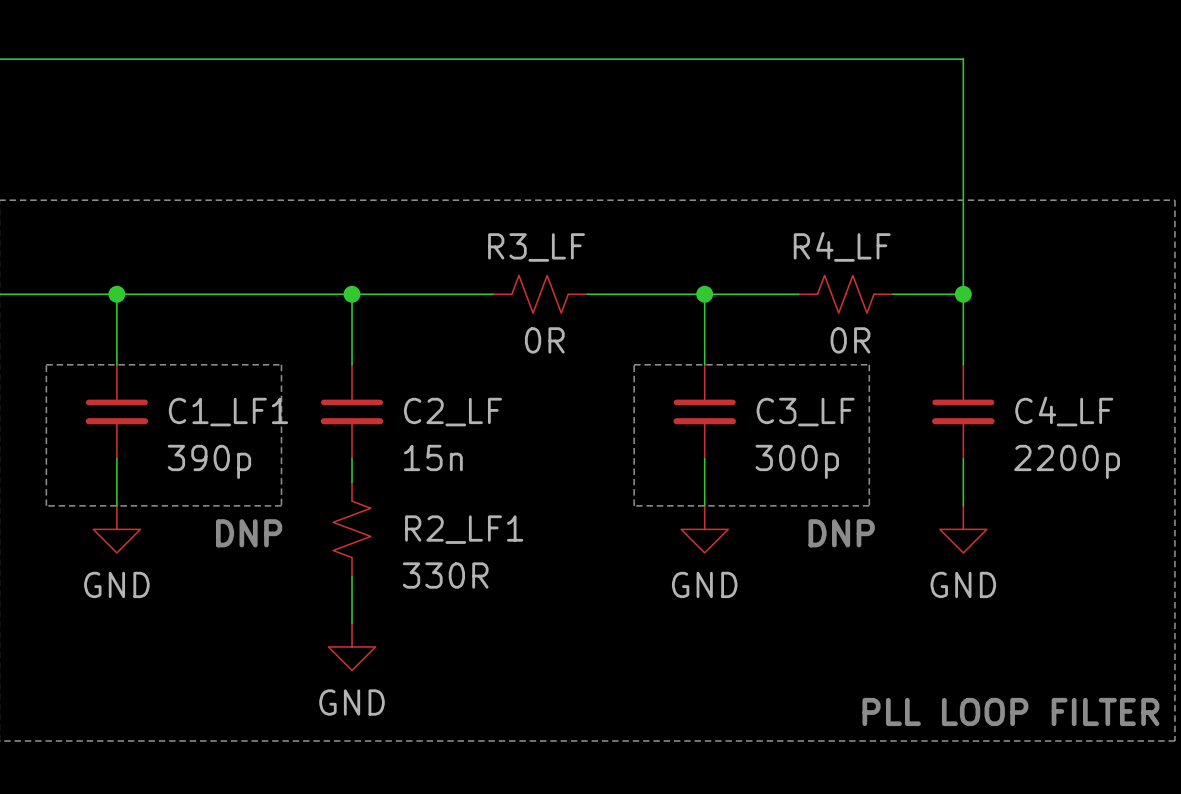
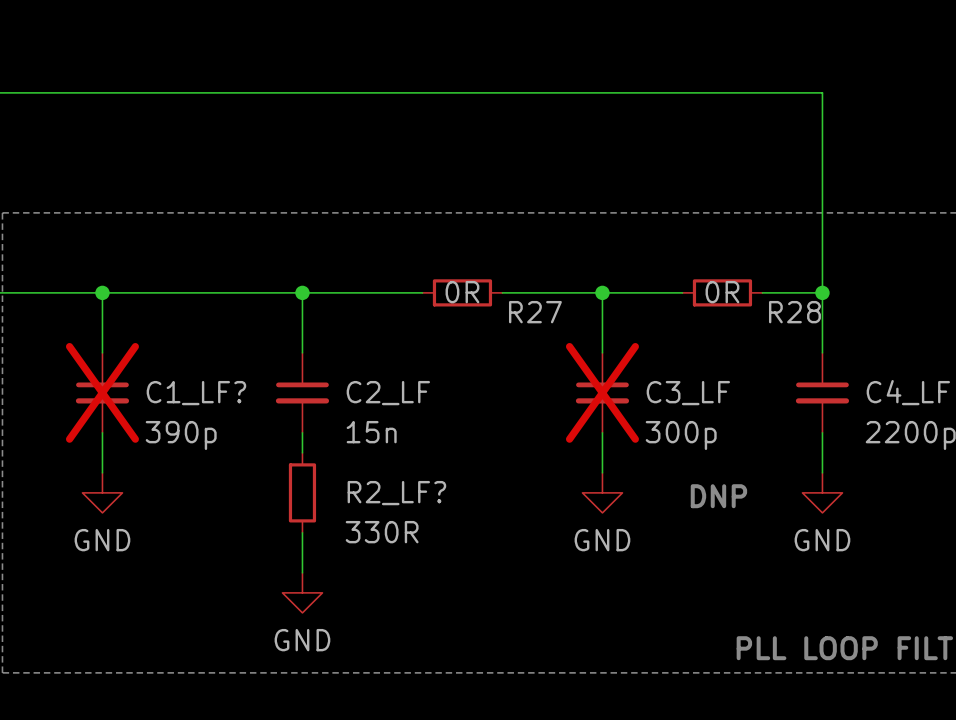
R3_LF: 0R (540, 294) -> none
R27: none -> 0R (462, 292)
R4_LF: 0R (845, 294) -> none
R28: none -> 0R (722, 292)
line: (46, 364) (281, 364) (281, 505) (46, 505) (46, 364) -> none
line: (634, 364) (869, 364) (869, 505) (634, 505) (634, 364) -> none
C1_LF1 do-not-place cross: none -> (102, 392)
C3_LF do-not-place cross: none -> (602, 392)
C1_LF1 name: C1_LF1 (228, 412) -> C1_LF? (196, 393)
R2_LF1: 330R (352, 529) -> none
R2_LF?: none -> 330R (302, 492)
text: DNP (249, 533) -> none

